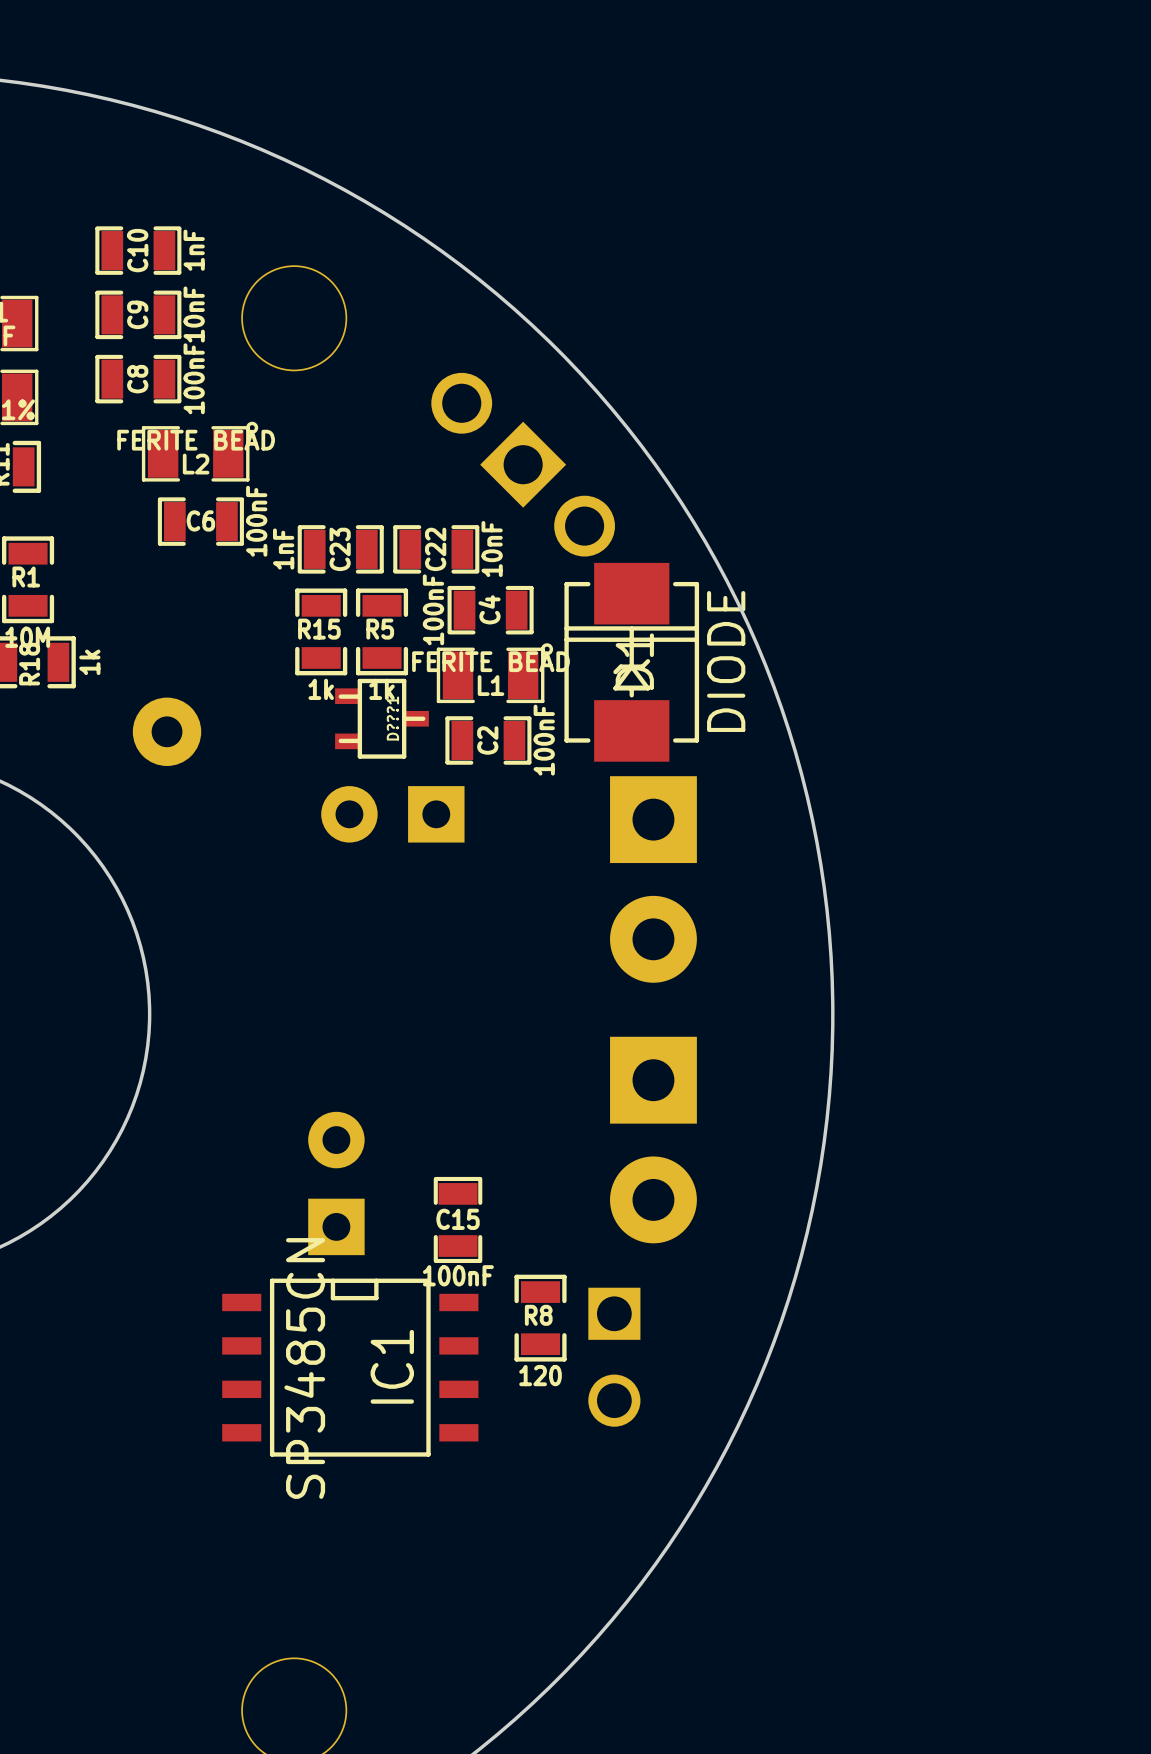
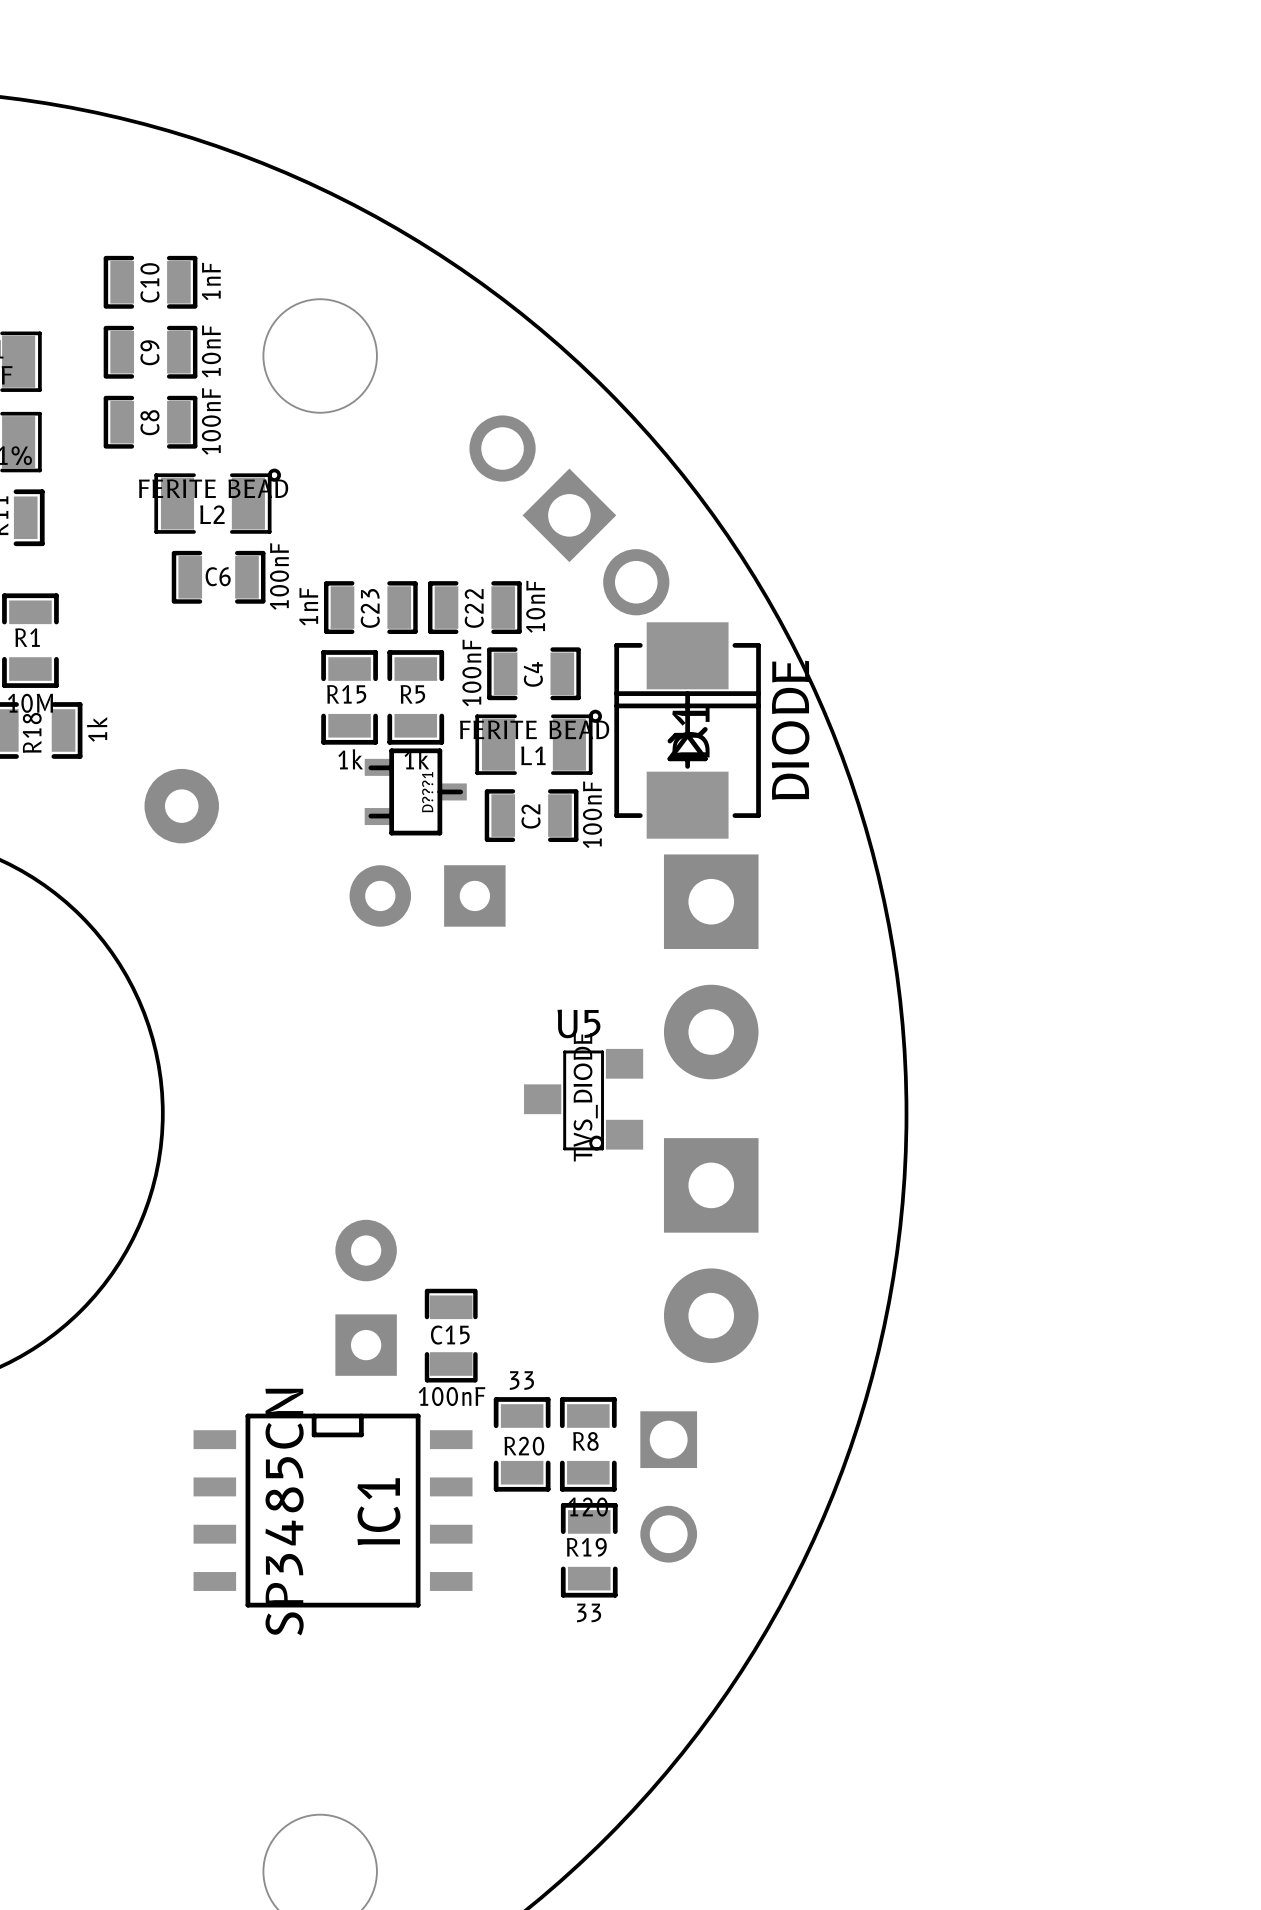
U5: none -> TVS_DIODE (583, 1099)
C15 position: (458, 1219) -> (451, 1335)
R20: none -> 33 (522, 1444)
IC1 position: (350, 1367) -> (333, 1510)
R19: none -> 33 (589, 1550)

